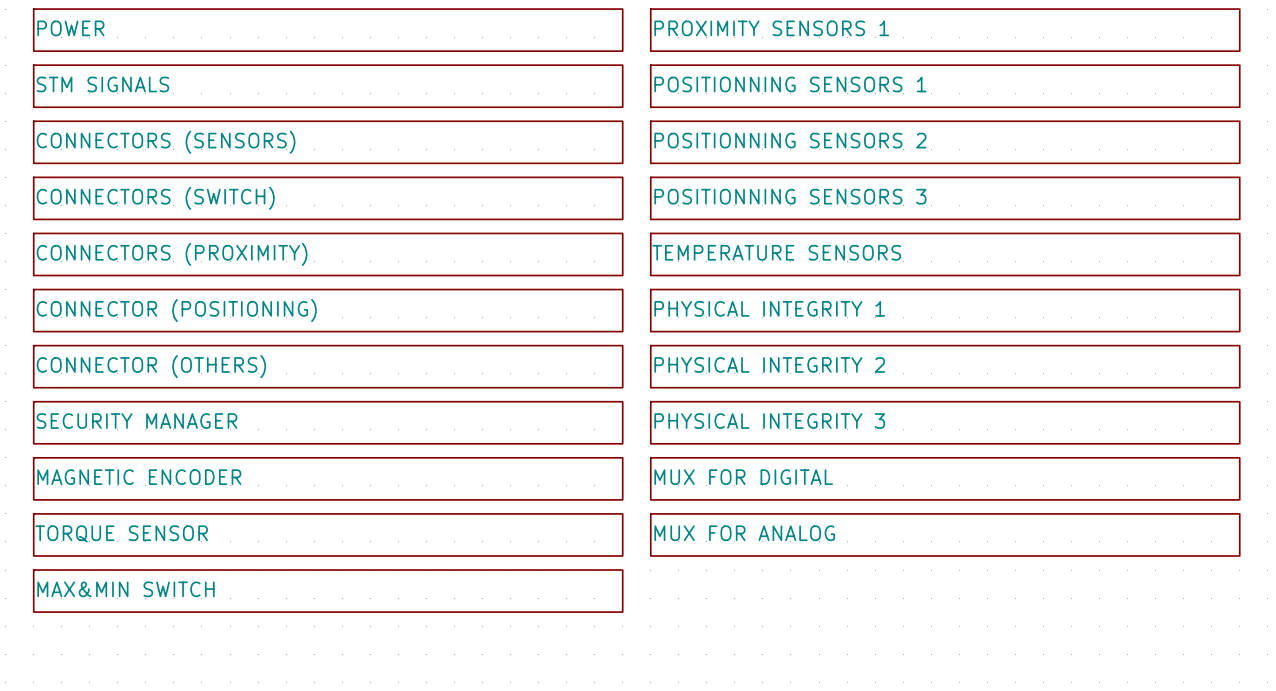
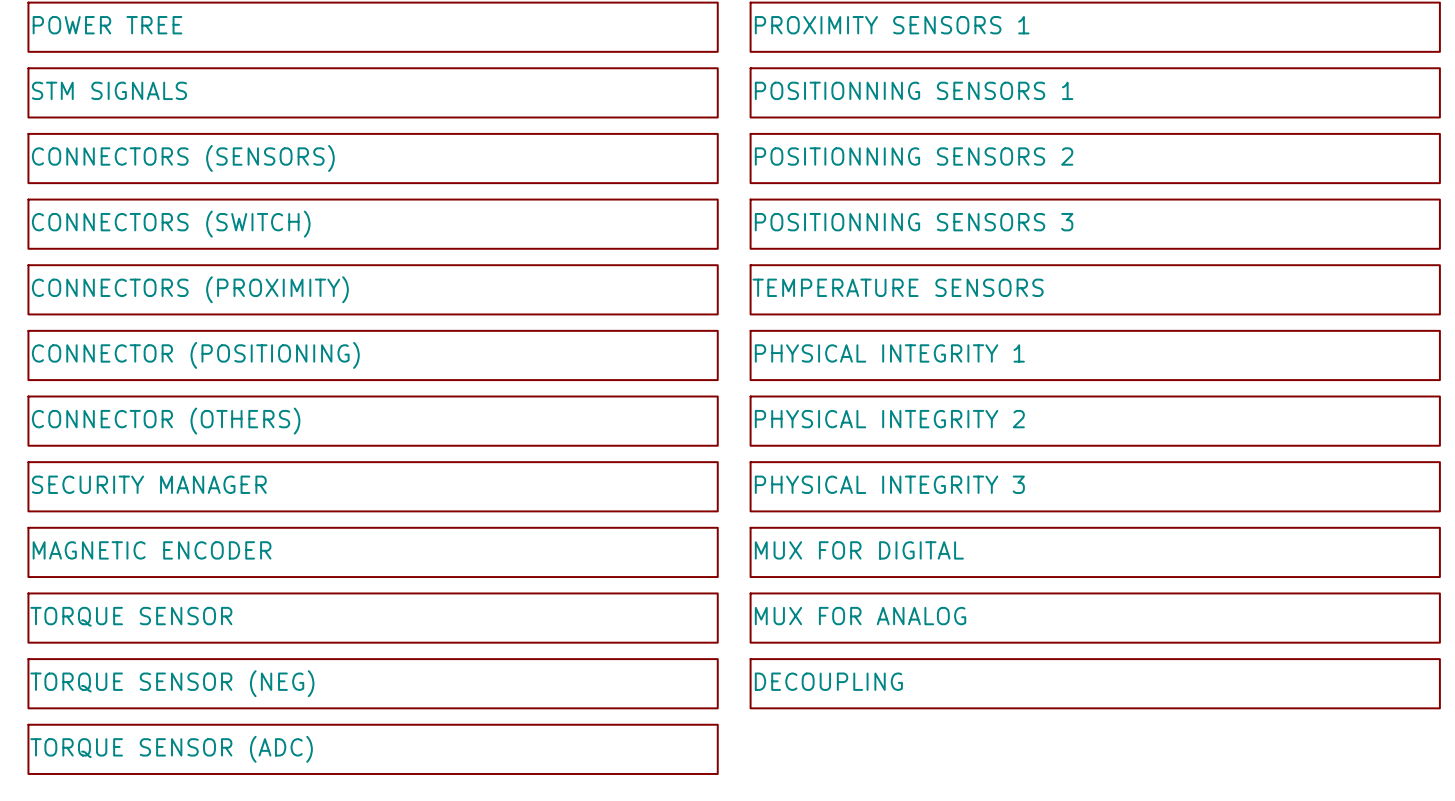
sheet POWER name: POWER (70, 28) -> POWER TREE (107, 25)
sheet MAX&MIN SWITCH name: MAX&MIN SWITCH (125, 589) -> TORQUE SENSOR (NEG) (172, 683)
sheet DECOUPLING: none -> (1095, 683)
sheet TORQUE SENSOR (ADC): none -> (373, 749)

